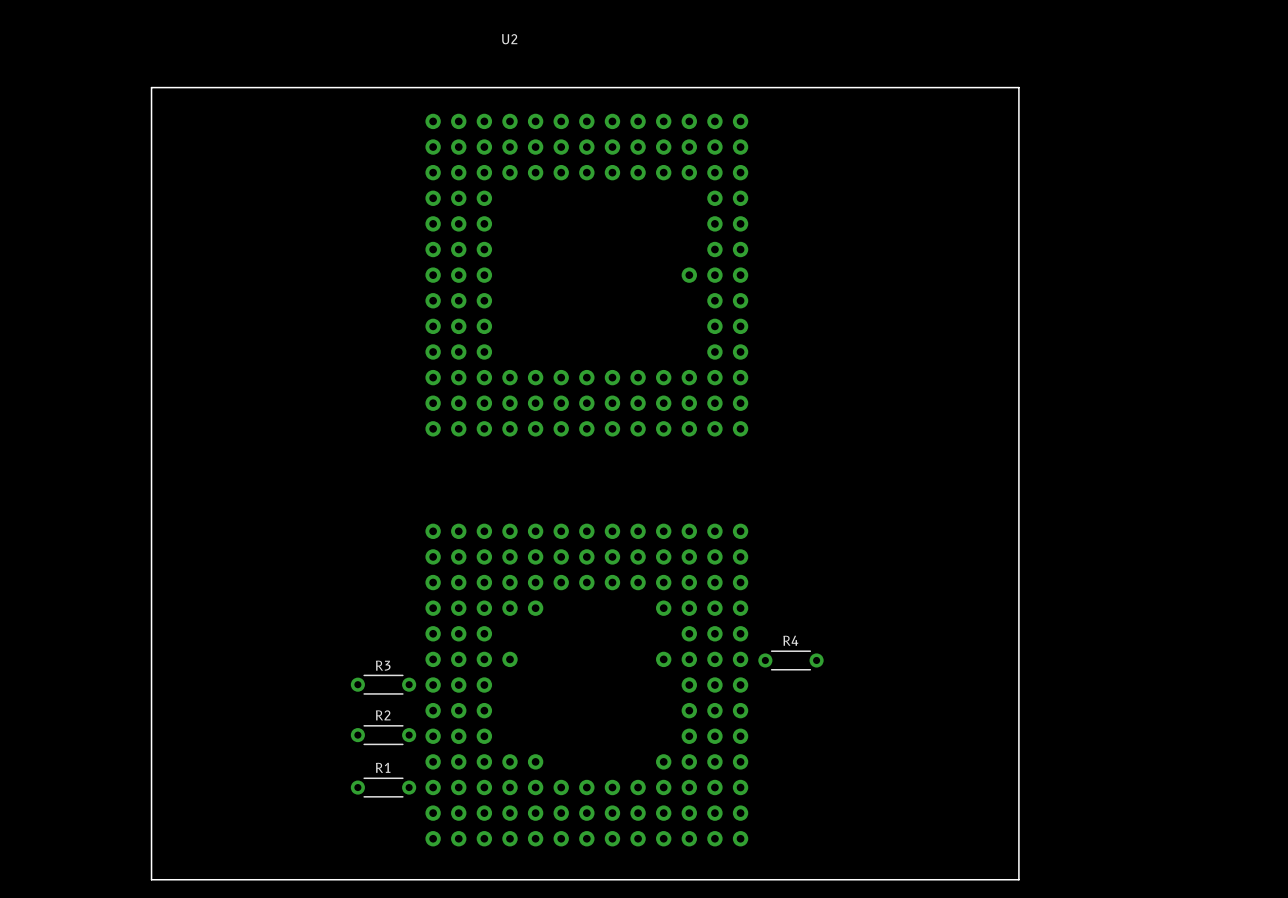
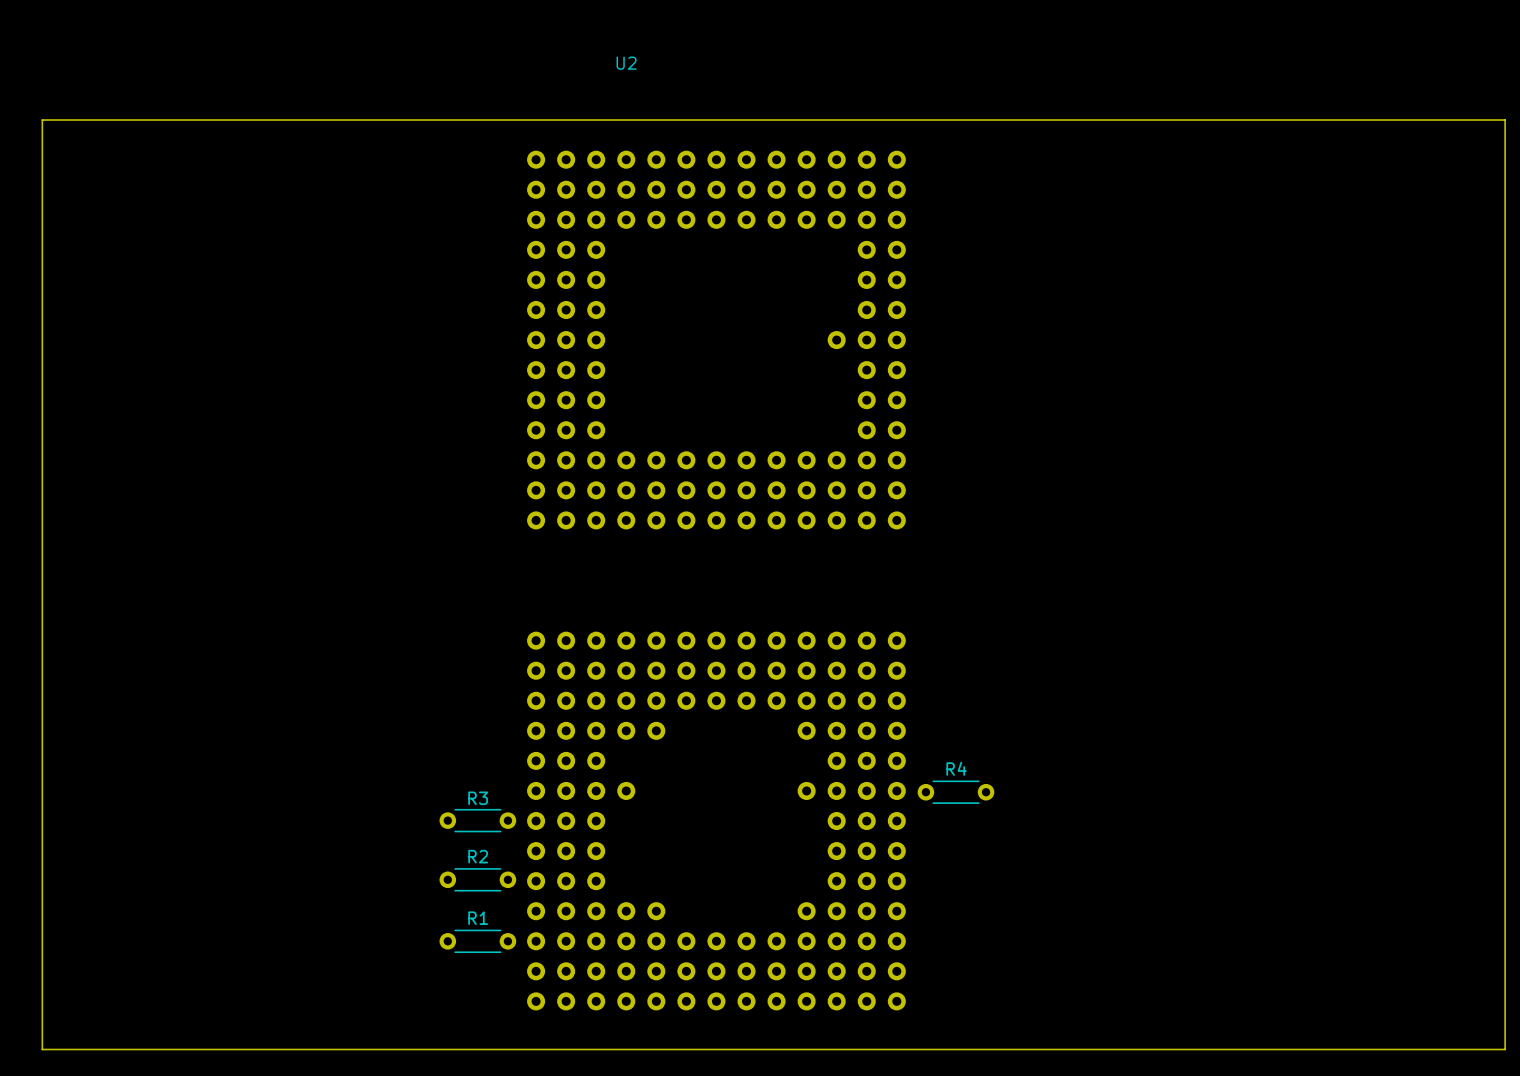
board edge: (151, 87) (151, 879) -> (205, 120) (42, 120) (42, 1049) (205, 1049)
board edge: (1018, 87) (1018, 879) -> (1223, 120) (1505, 120) (1505, 1049) (1223, 1049)

